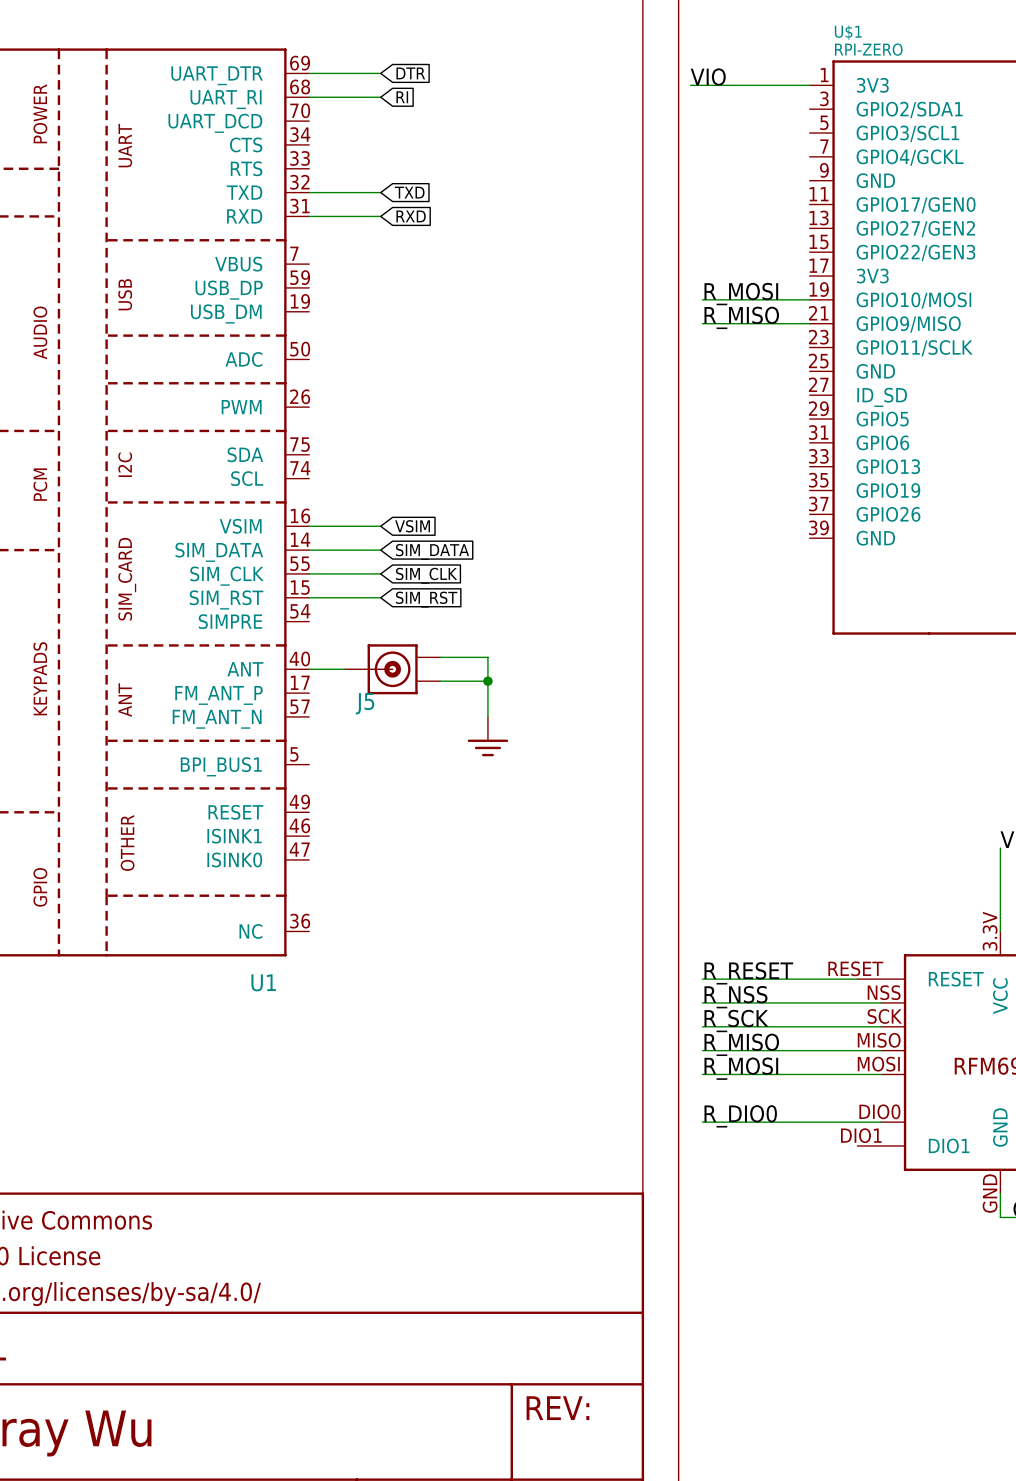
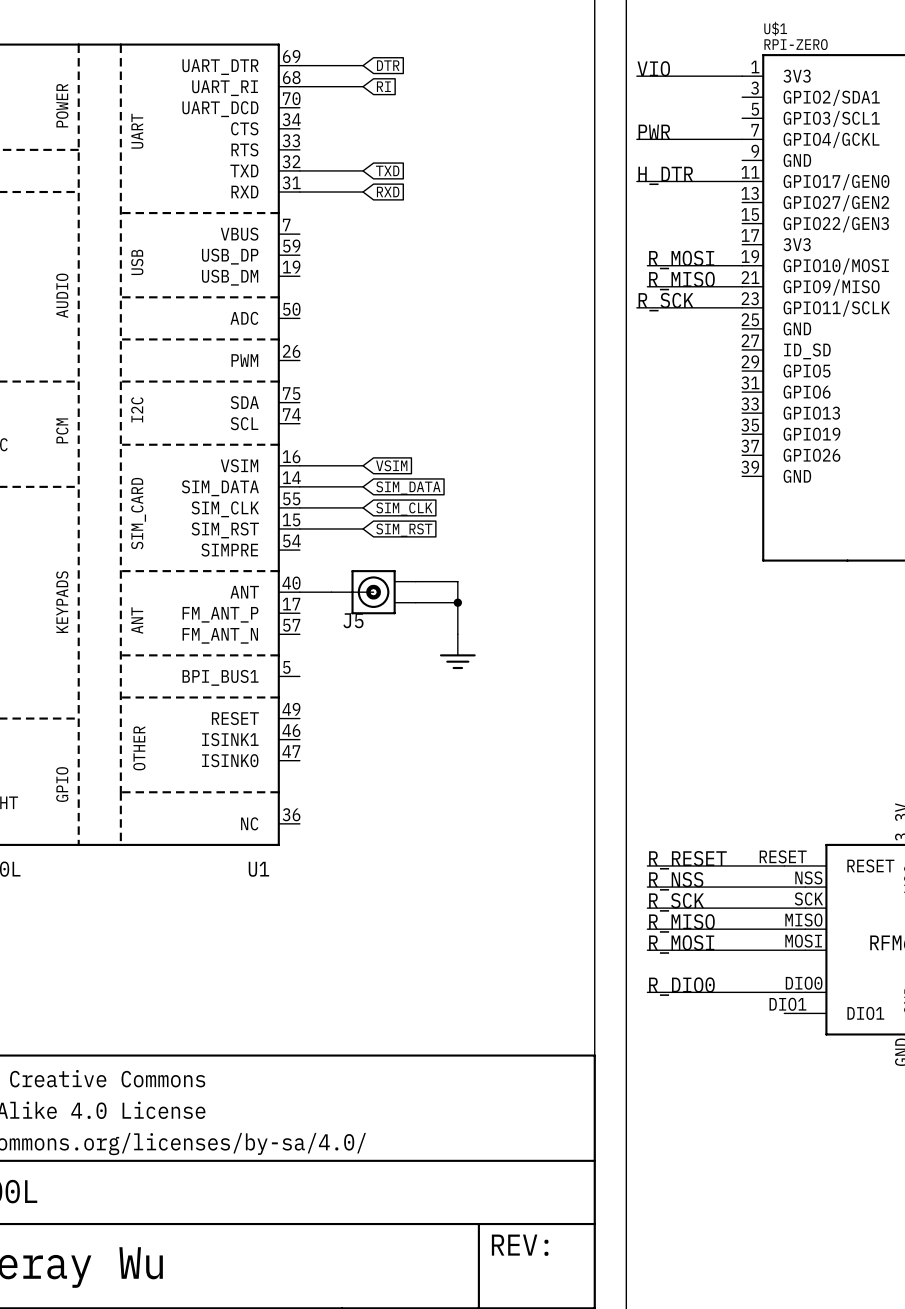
label: none -> PWR (654, 131)
wire: none -> (636, 139) (742, 139)
label: none -> H_DTR (665, 175)
wire: none -> (636, 181) (742, 181)
label: none -> R_SCK (666, 302)
wire: none -> (636, 307) (742, 307)

